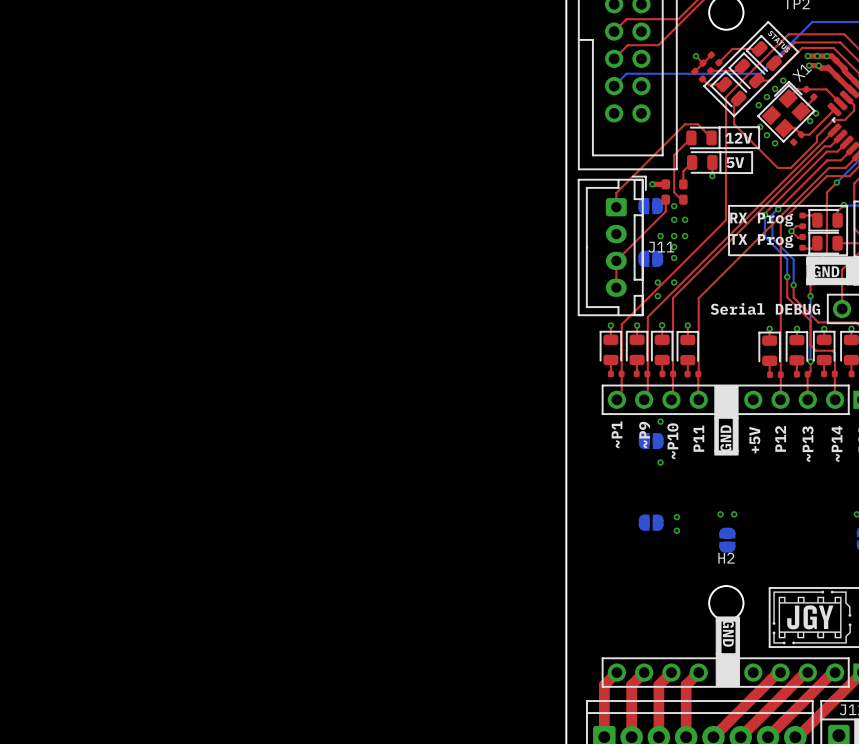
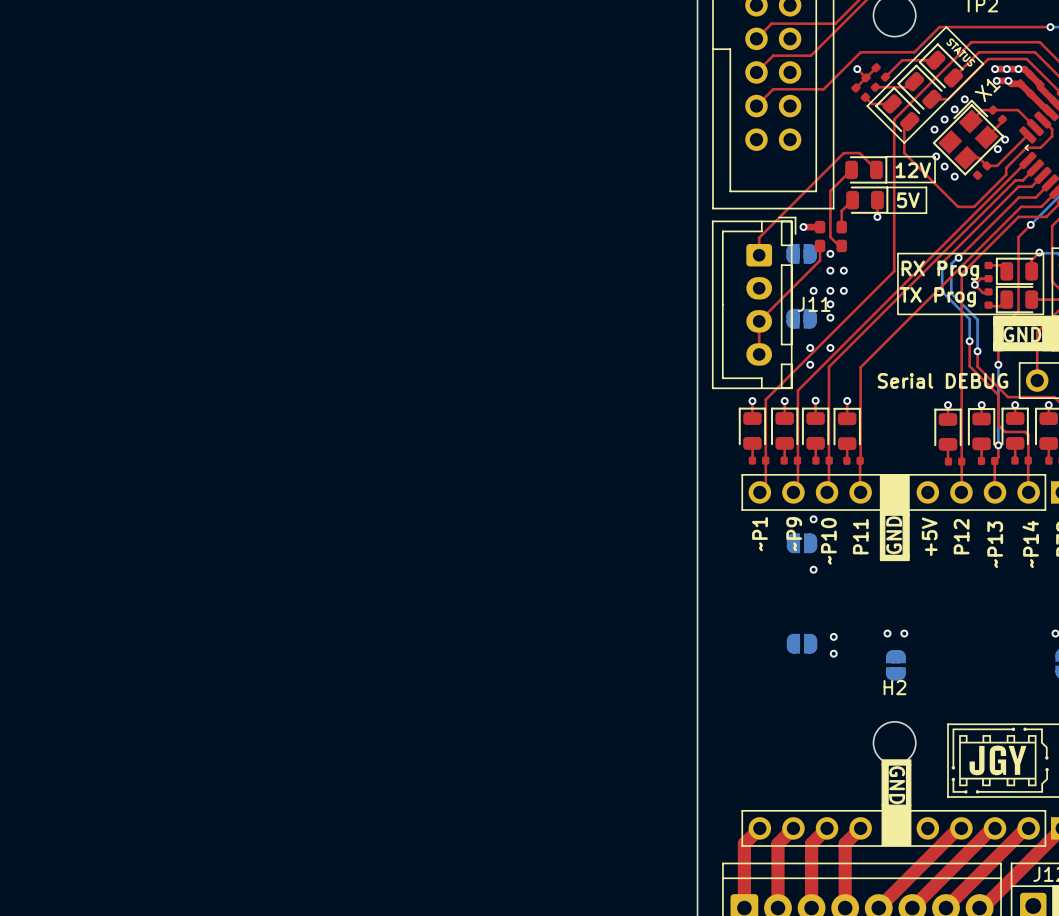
top track: none -> (1050, 27) (939, 27) (914, 52) (860, 52) (823, 89) (773, 89) (756, 106)
bottom track: (852, 22) (812, 22) (760, 73) (626, 73) (614, 86) -> none
via: none -> (1050, 27)

